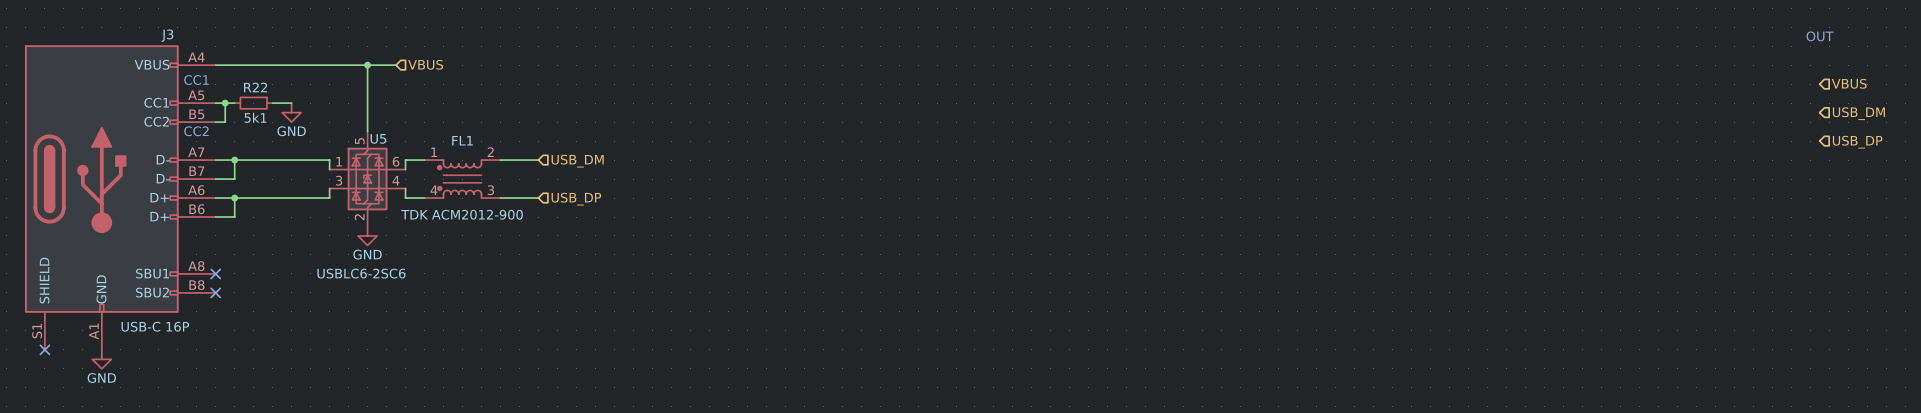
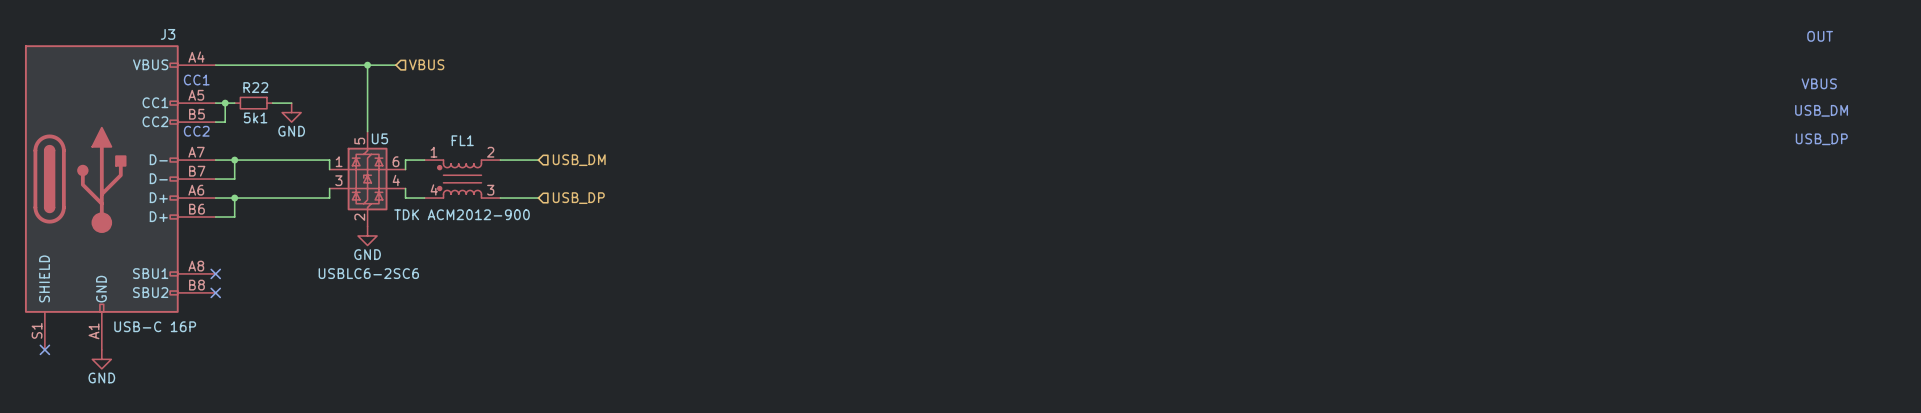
text: none -> VBUS (1819, 83)
hierarchical label: VBUS (1849, 83) -> none
text: none -> USB_DM (1821, 110)
hierarchical label: USB_DM (1858, 113) -> none
text: none -> USB_DP (1821, 139)
hierarchical label: USB_DP (1857, 142) -> none

